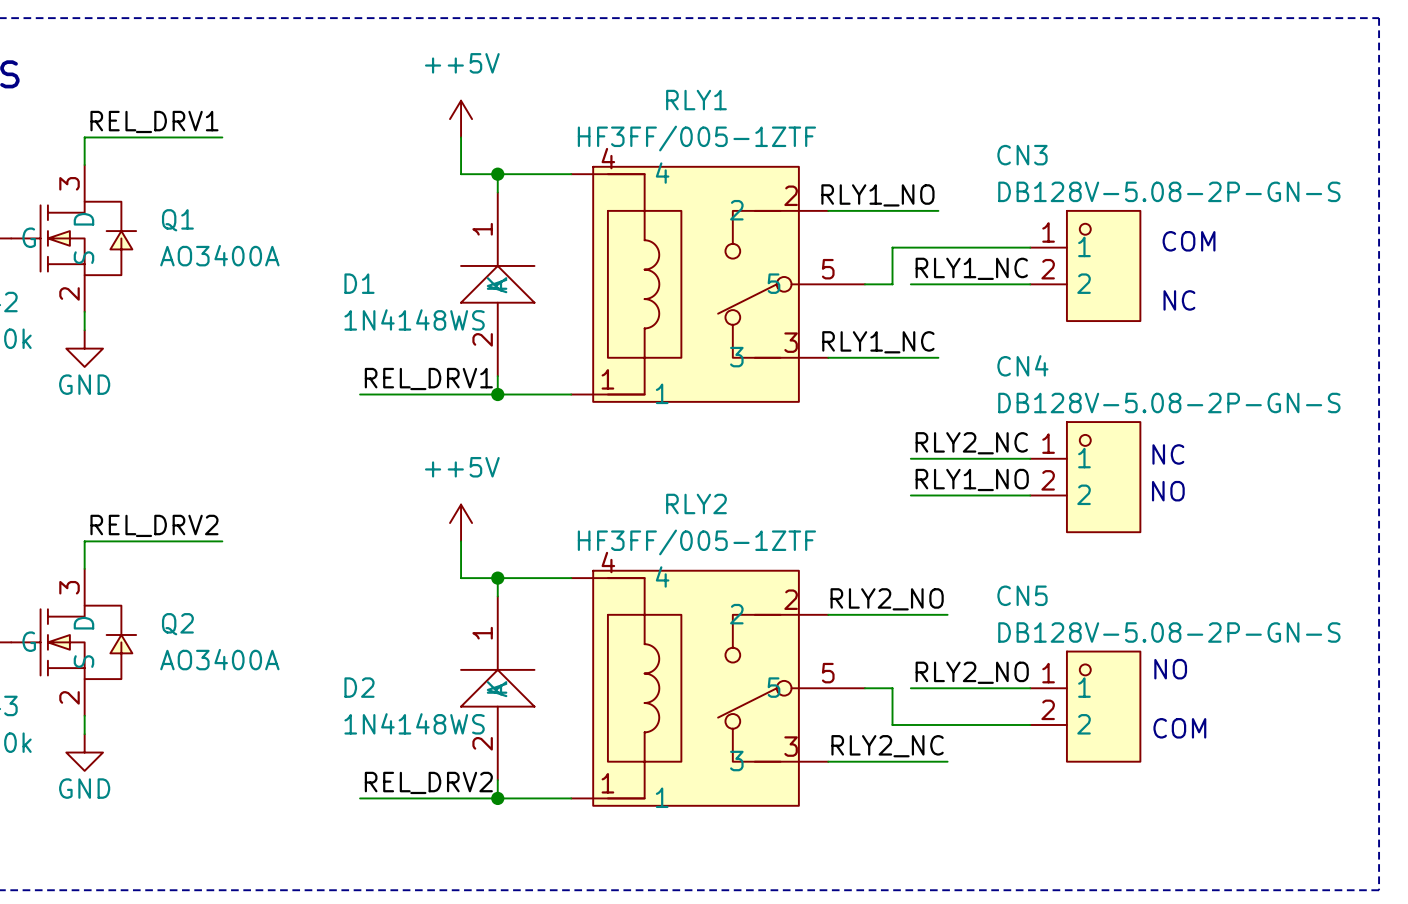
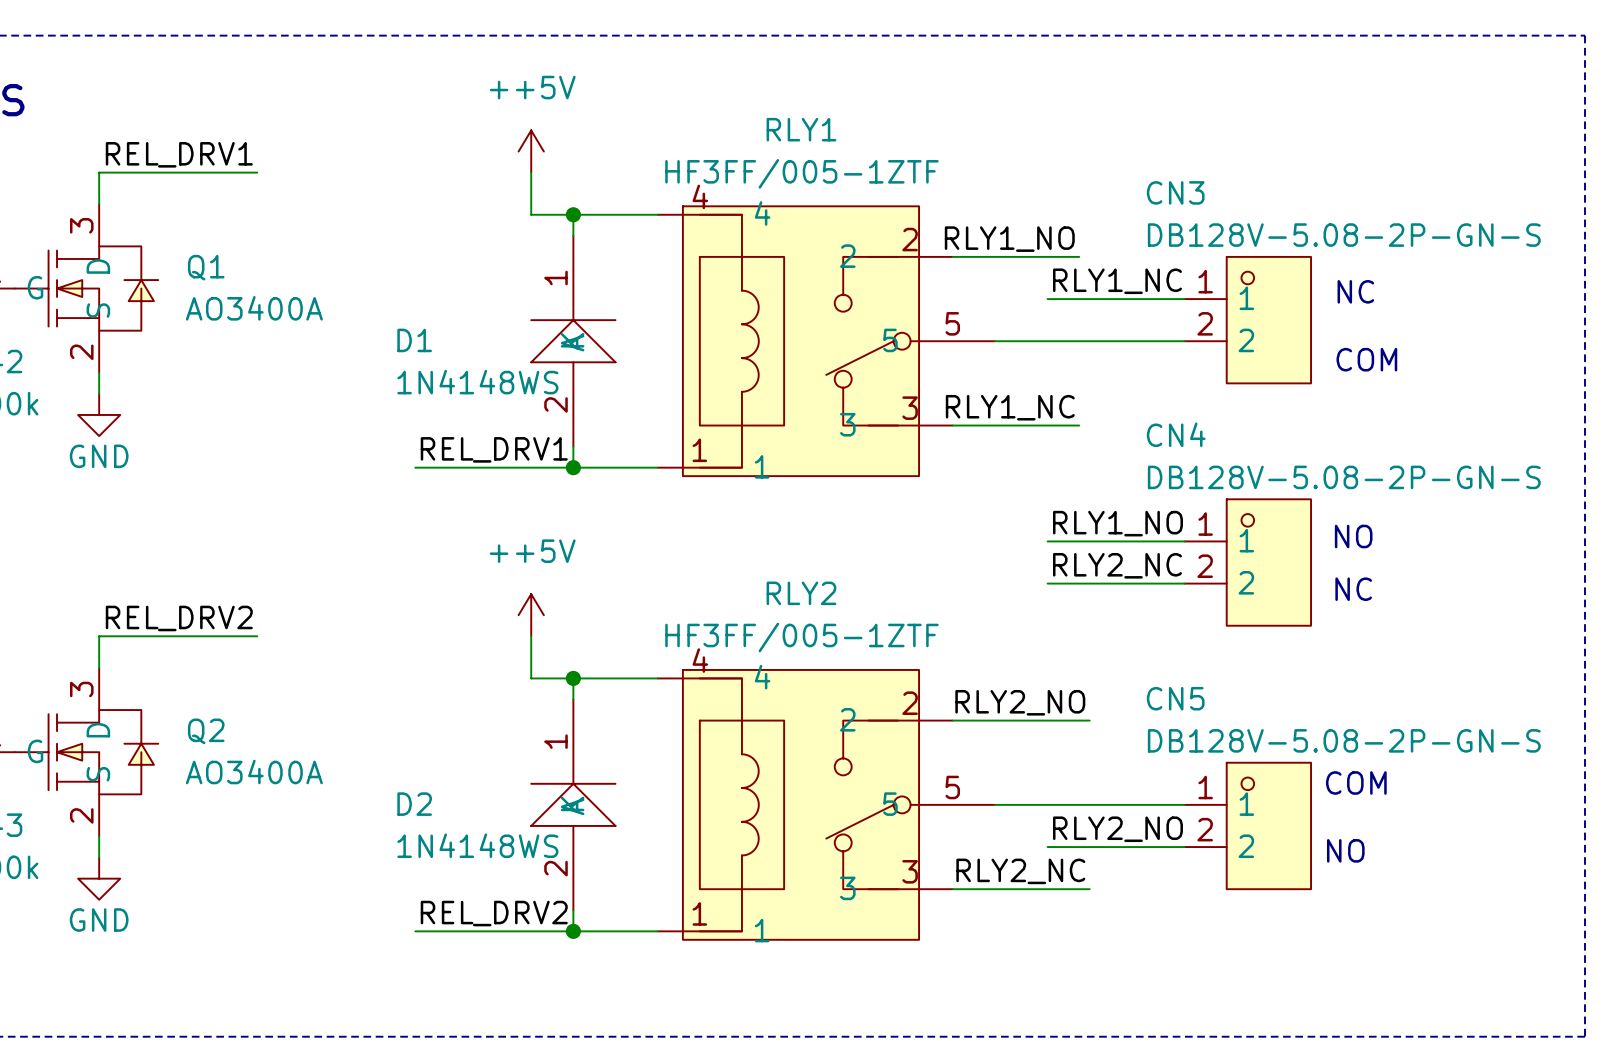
text: COM (1189, 241) -> NC (1355, 291)
wire: (910, 247) (892, 247) (892, 284) -> (1047, 341) (1026, 341)
label position: RLY1_NC (971, 268) -> RLY1_NC (1117, 281)
text: NC (1179, 300) -> COM (1366, 359)
label: RLY2_NC (971, 443) -> RLY1_NO (1117, 523)
text position: NC (1168, 454) -> NC (1353, 589)
label: RLY1_NO (972, 479) -> RLY2_NC (1117, 565)
text position: NO (1168, 491) -> NO (1353, 536)
text: NO (1170, 669) -> COM (1356, 782)
label position: RLY2_NO (972, 672) -> RLY2_NO (1117, 829)
wire: (892, 688) (892, 724) (910, 724) -> (1026, 804) (1047, 804)
text: COM (1179, 728) -> NO (1345, 850)

